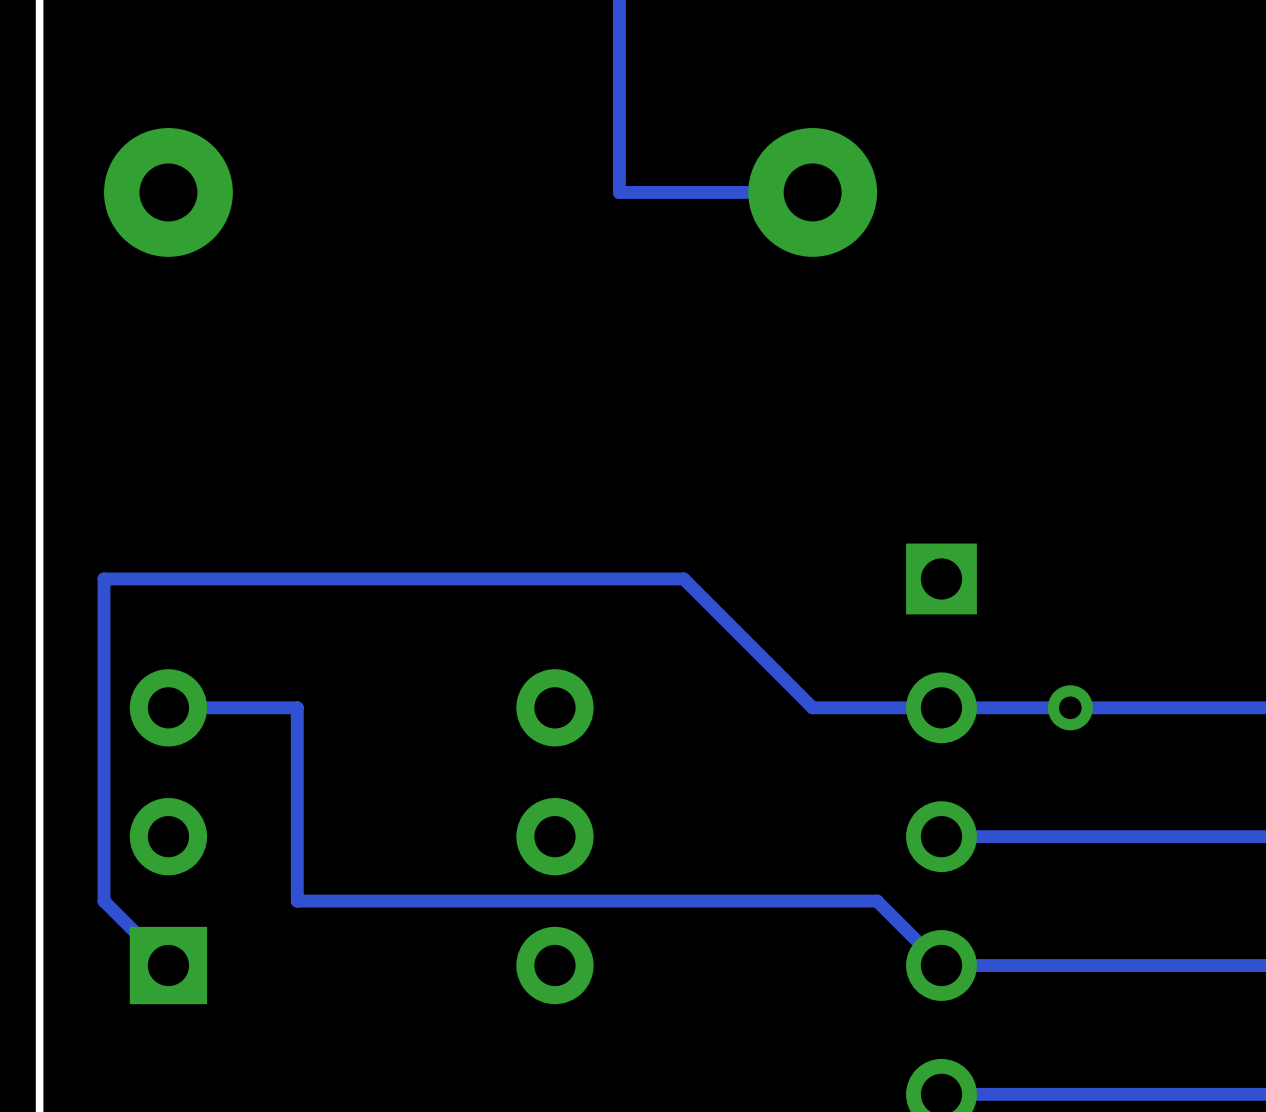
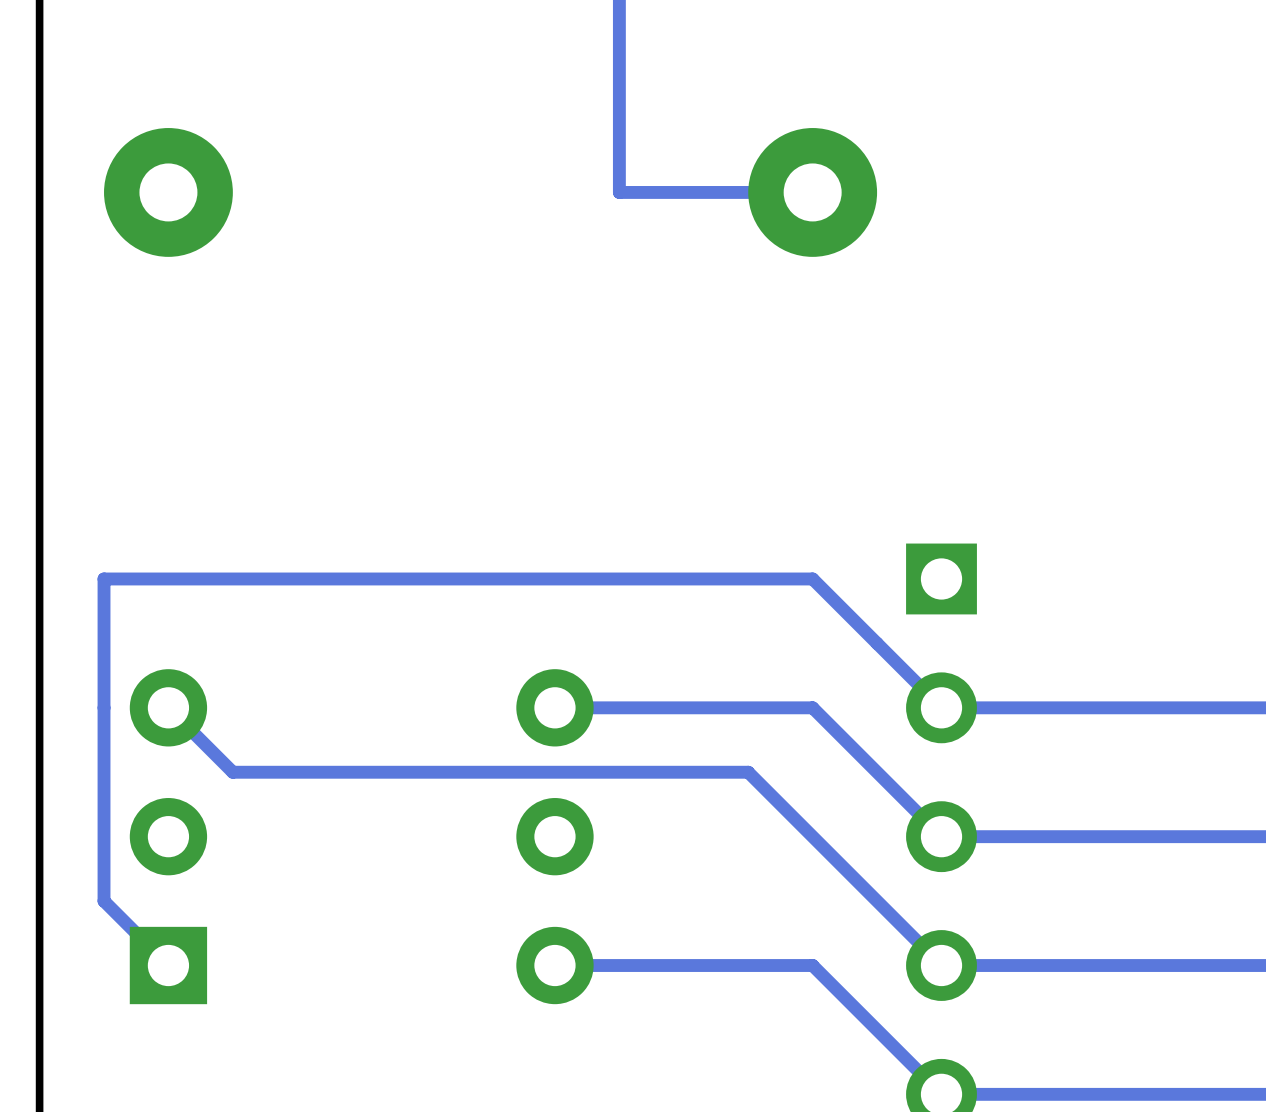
track: (683, 578) (812, 707) (941, 707) -> (683, 578) (812, 578) (941, 707)
track: (168, 707) (297, 707) (297, 901) (877, 901) -> (168, 707) (232, 772) (748, 772) (877, 901)
track: none -> (554, 707) (812, 707) (941, 836)
via: (1070, 707) -> none
track: none -> (554, 965) (812, 965) (941, 1094)

